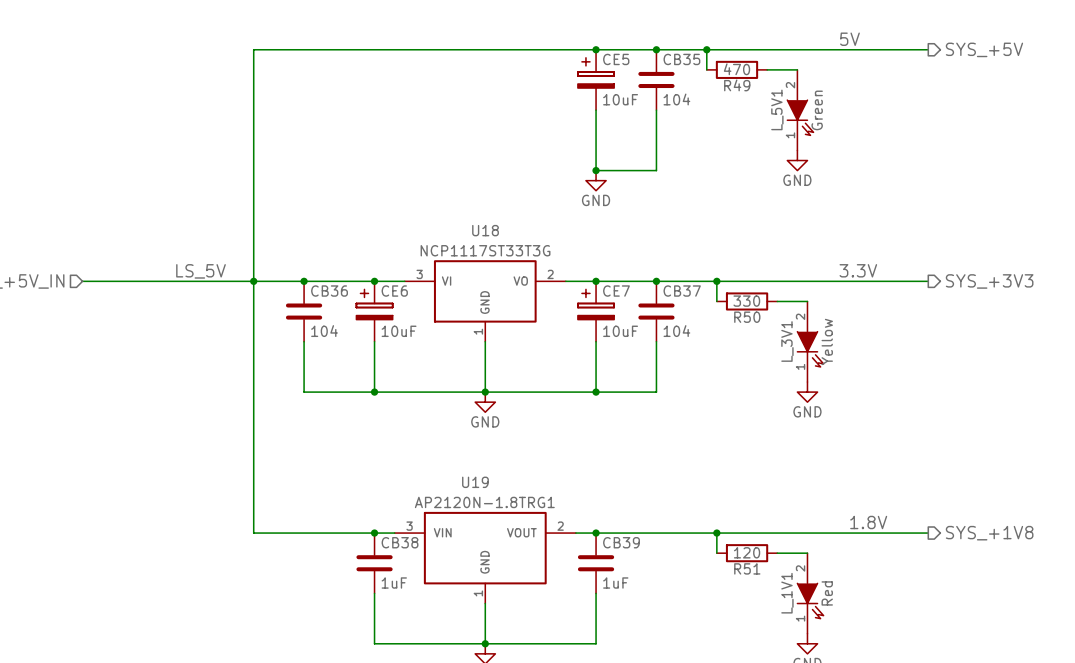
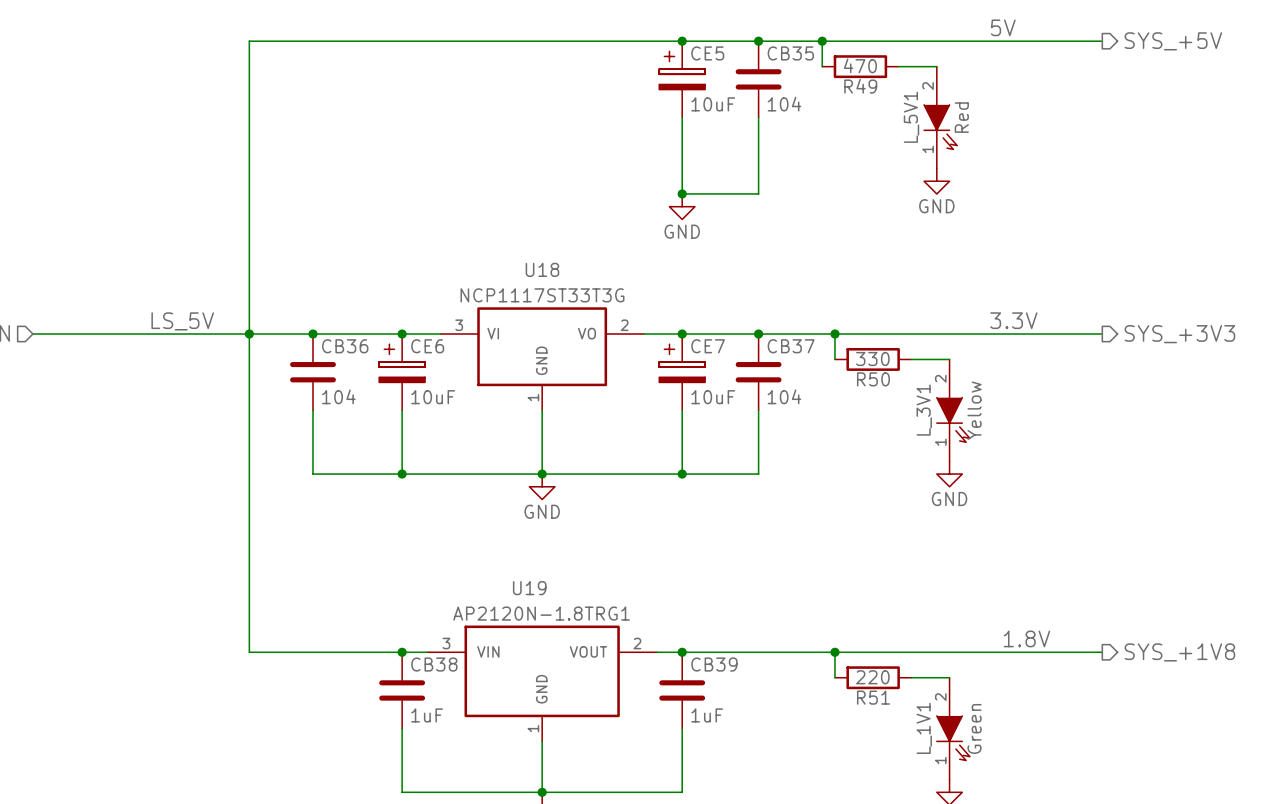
L_5V1 value: Green (817, 110) -> Red (961, 117)
R51 value: 120 (747, 552) -> 220 (872, 677)
L_1V1 value: Red (827, 593) -> Green (974, 728)

